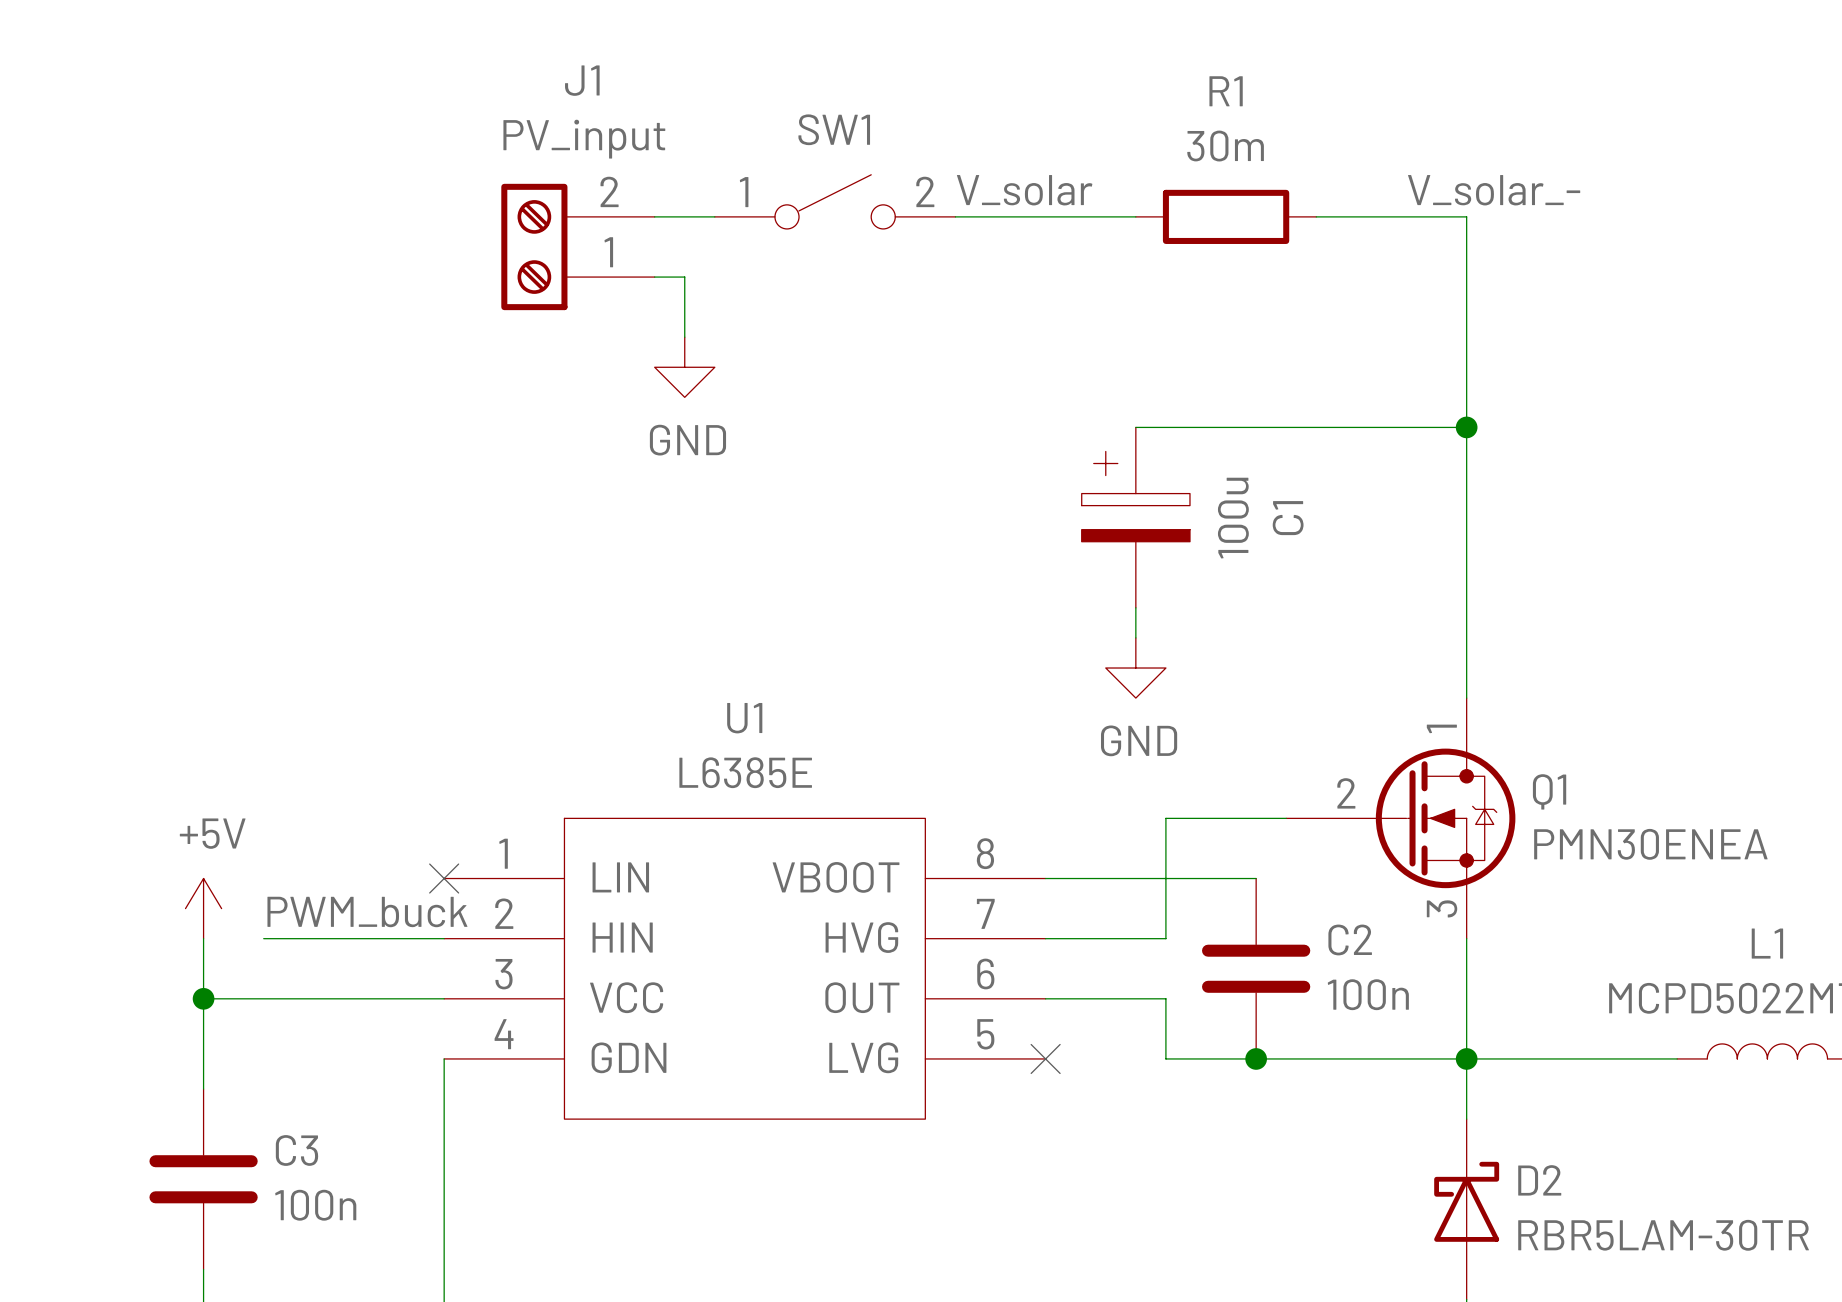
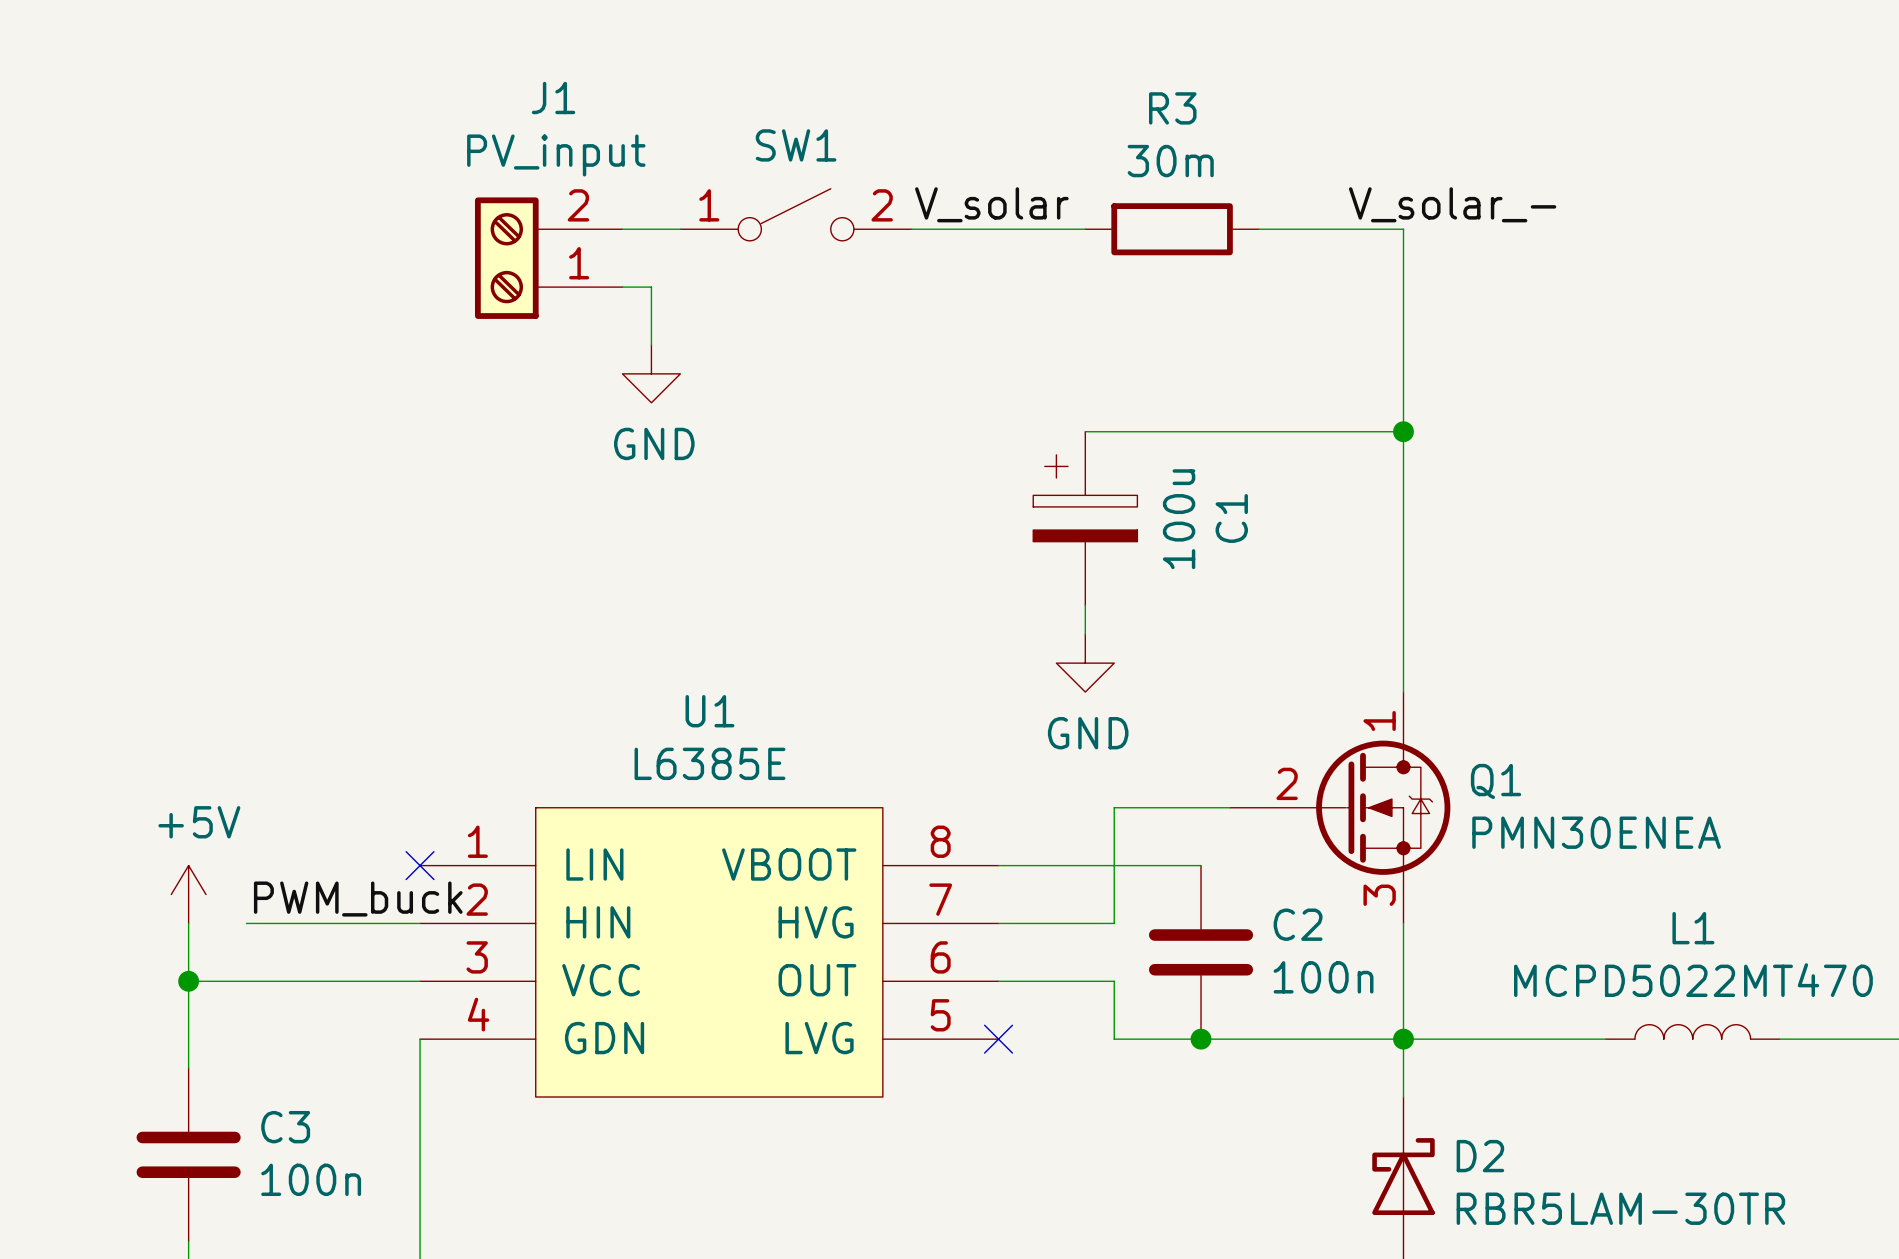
R1 name: R1 (1226, 91) -> R3 (1172, 108)

